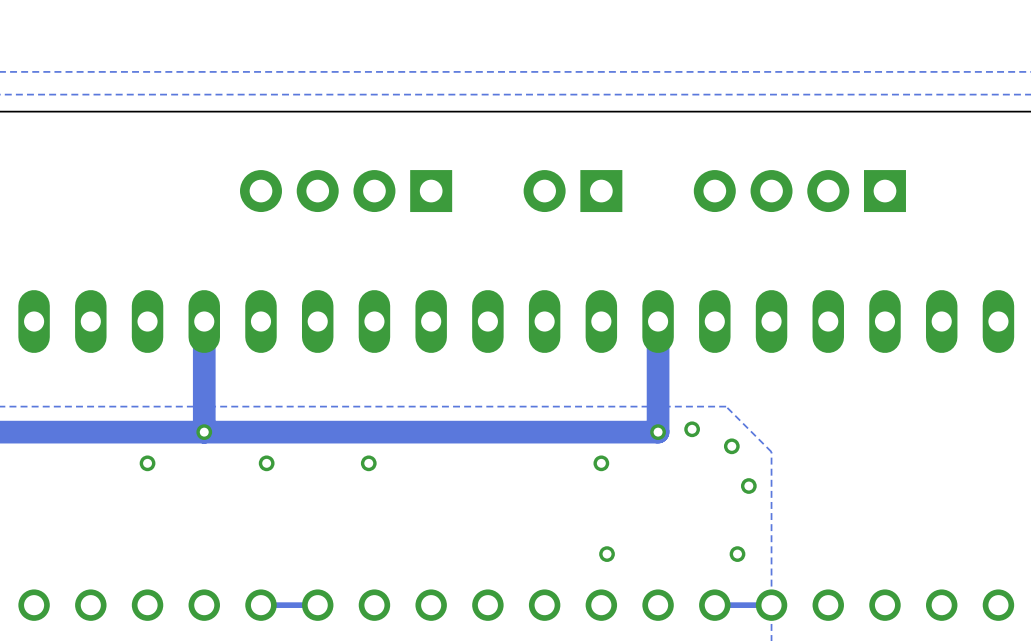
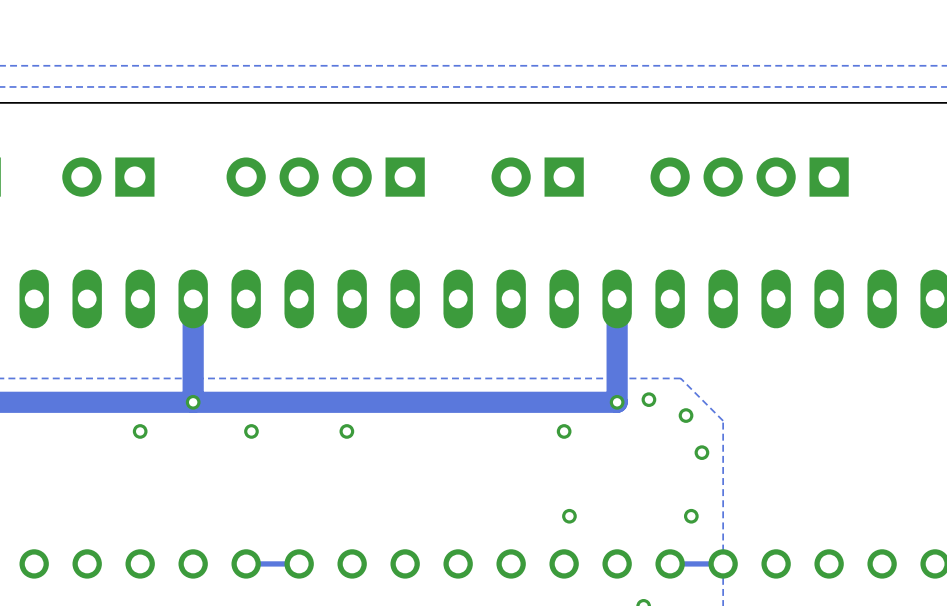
part: none -> (108, 177)

